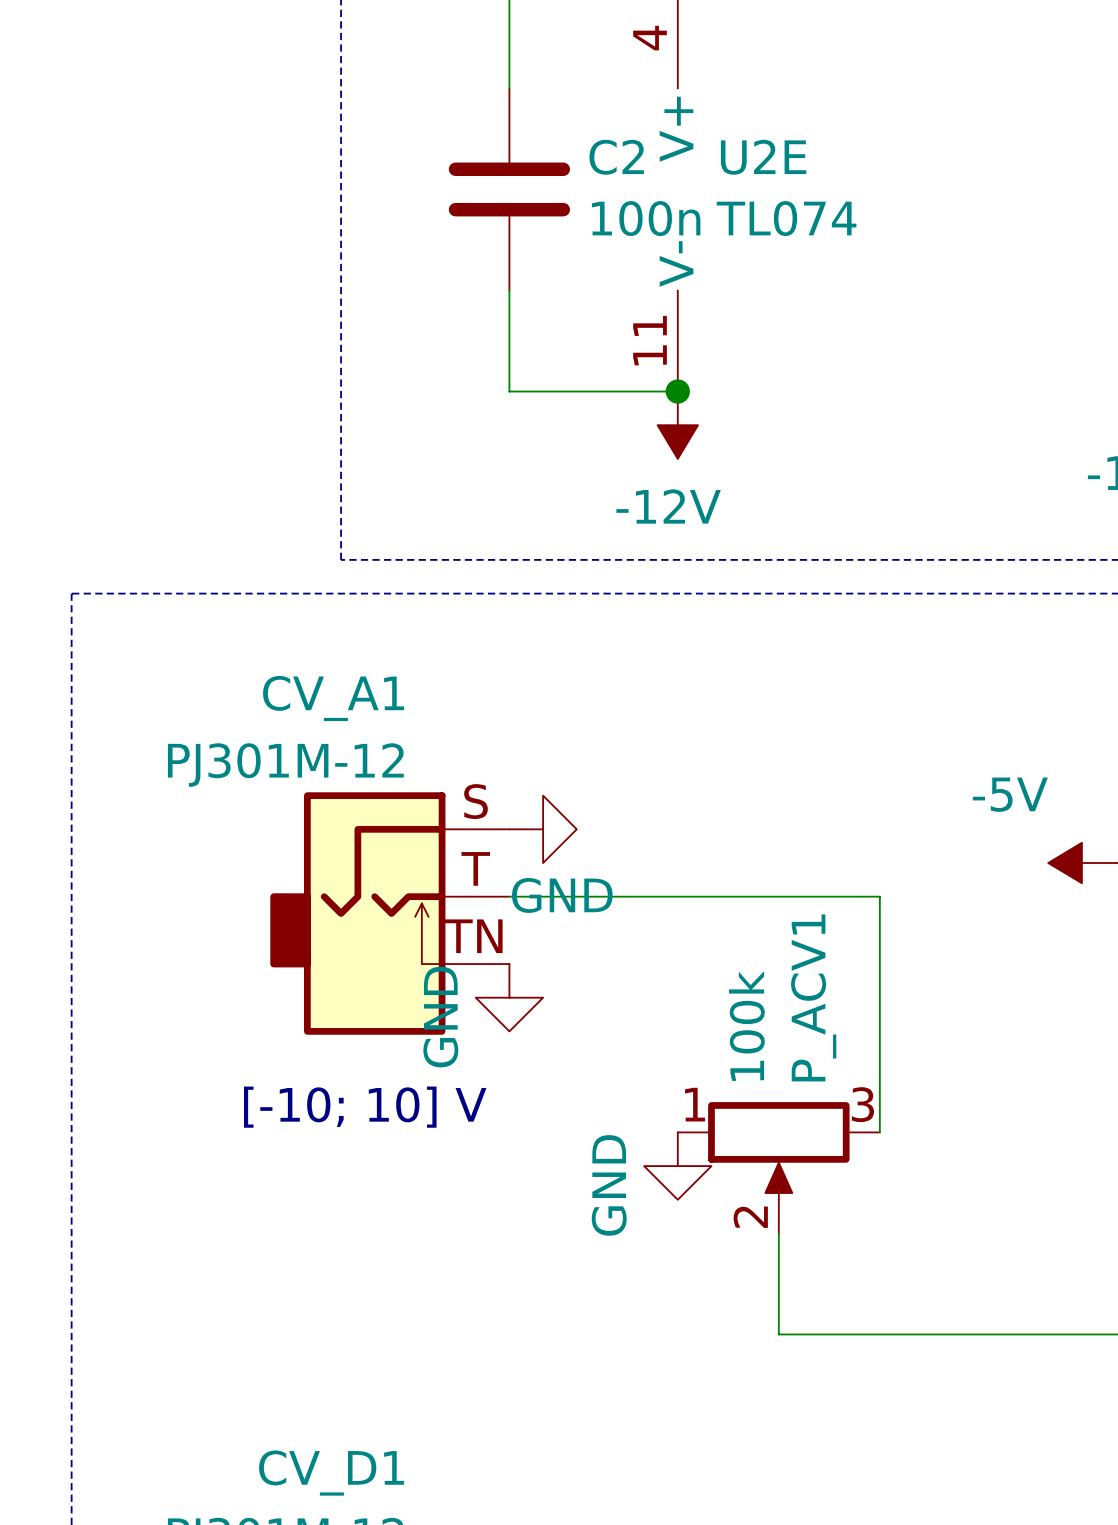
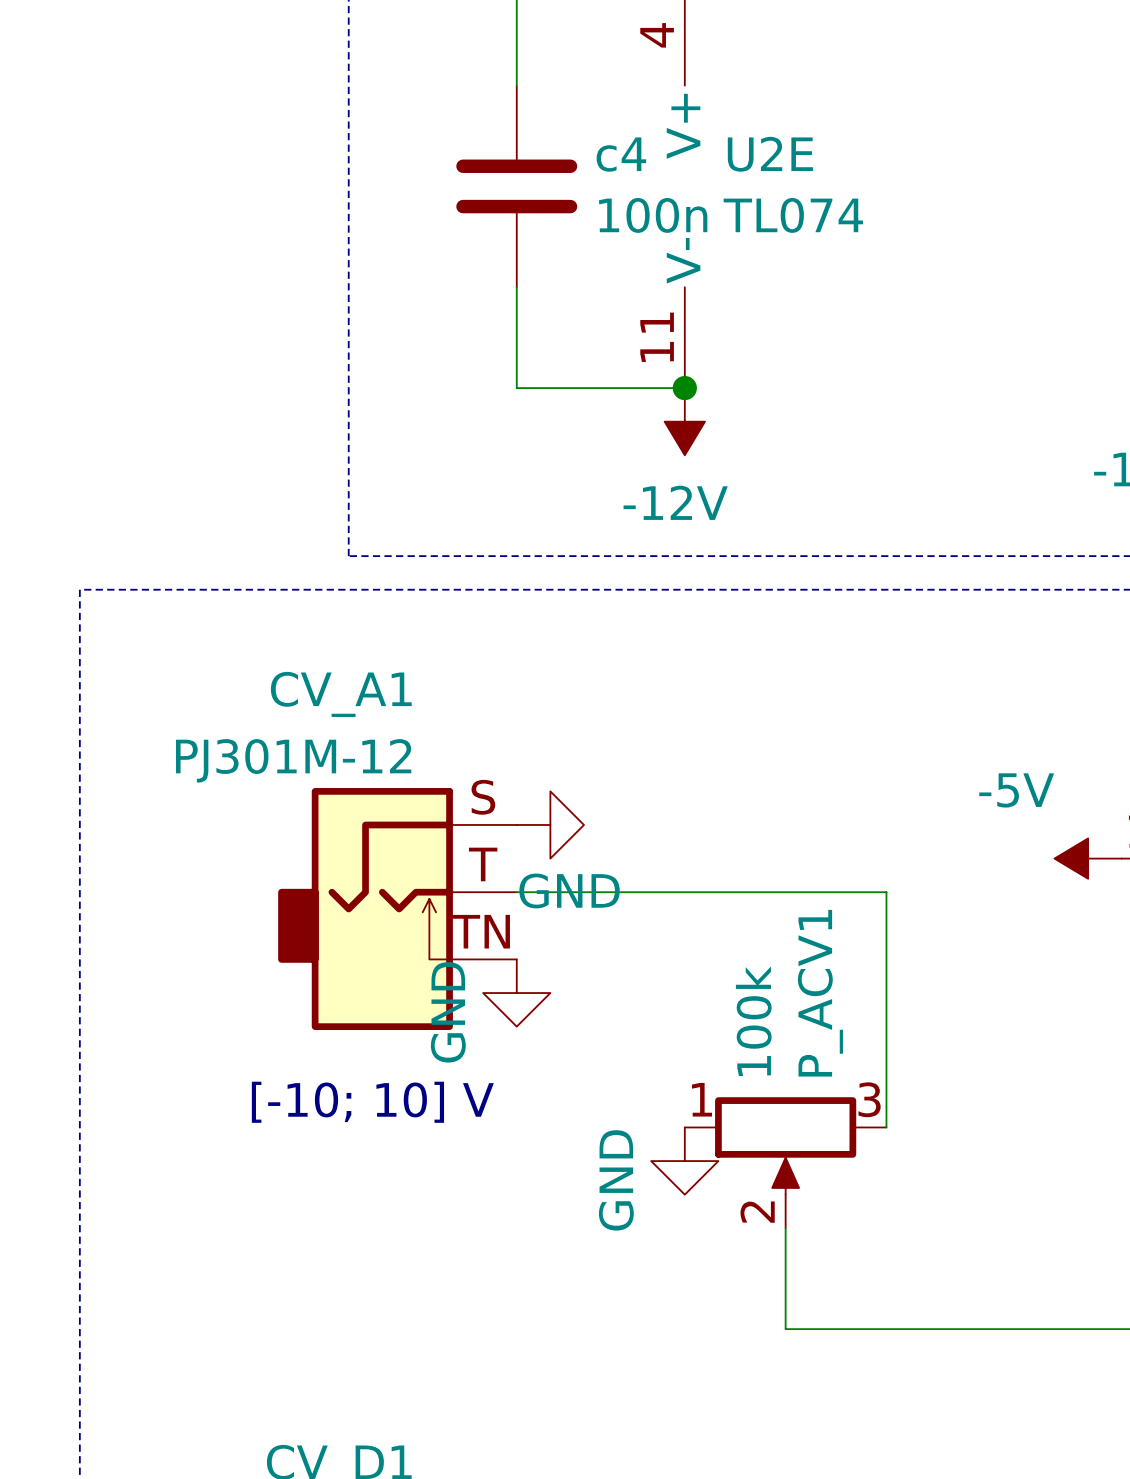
C2 name: C2 (616, 157) -> c4 (621, 154)

